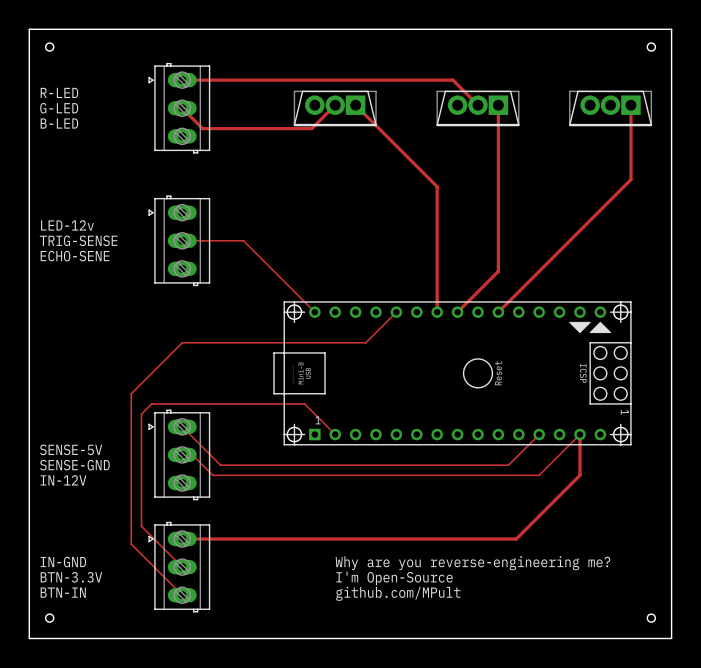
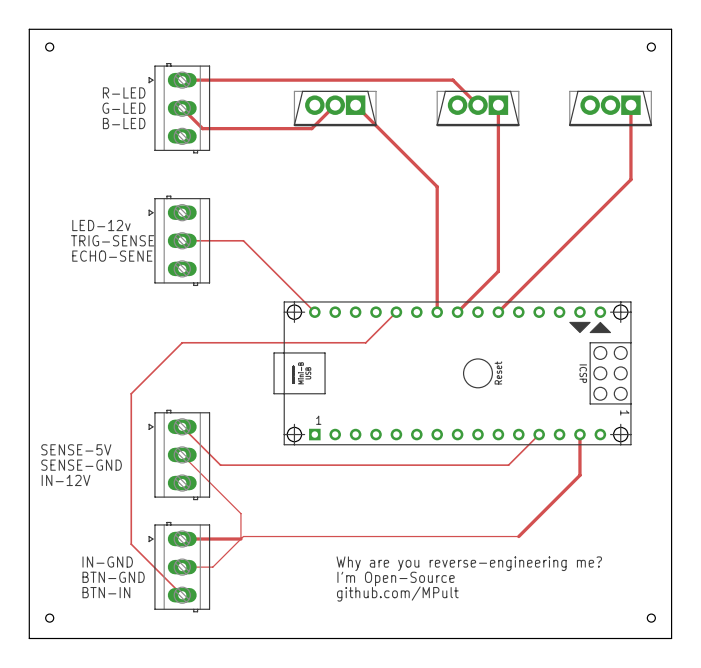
text position: R-LED (59, 92) -> R-LED (124, 92)
text position: G-LED (59, 108) -> G-LED (123, 108)
text position: B-LED (59, 123) -> B-LED (124, 123)
text position: LED-12v (67, 225) -> LED-12v (101, 225)
text position: TRIG-SENSE (78, 240) -> TRIG-SENSE (112, 240)
text position: ECHO-SENE (75, 256) -> ECHO-SENE (112, 256)
track: (335, 434) (304, 403) (151, 403) (141, 414) (141, 526) (182, 567) -> none
track: (579, 434) (539, 475) (212, 475) (192, 454) (182, 454) -> (240, 539) (240, 513) (182, 454)
track: (518, 536) (516, 539) (240, 539) -> (518, 536) (243, 536) (212, 567) (182, 567)
text position: IN-GND (63, 562) -> IN-GND (107, 562)
text: BTN-3.3V (71, 577) -> none
text: none -> BTN-GND (113, 577)
text position: BTN-IN (63, 592) -> BTN-IN (106, 592)

